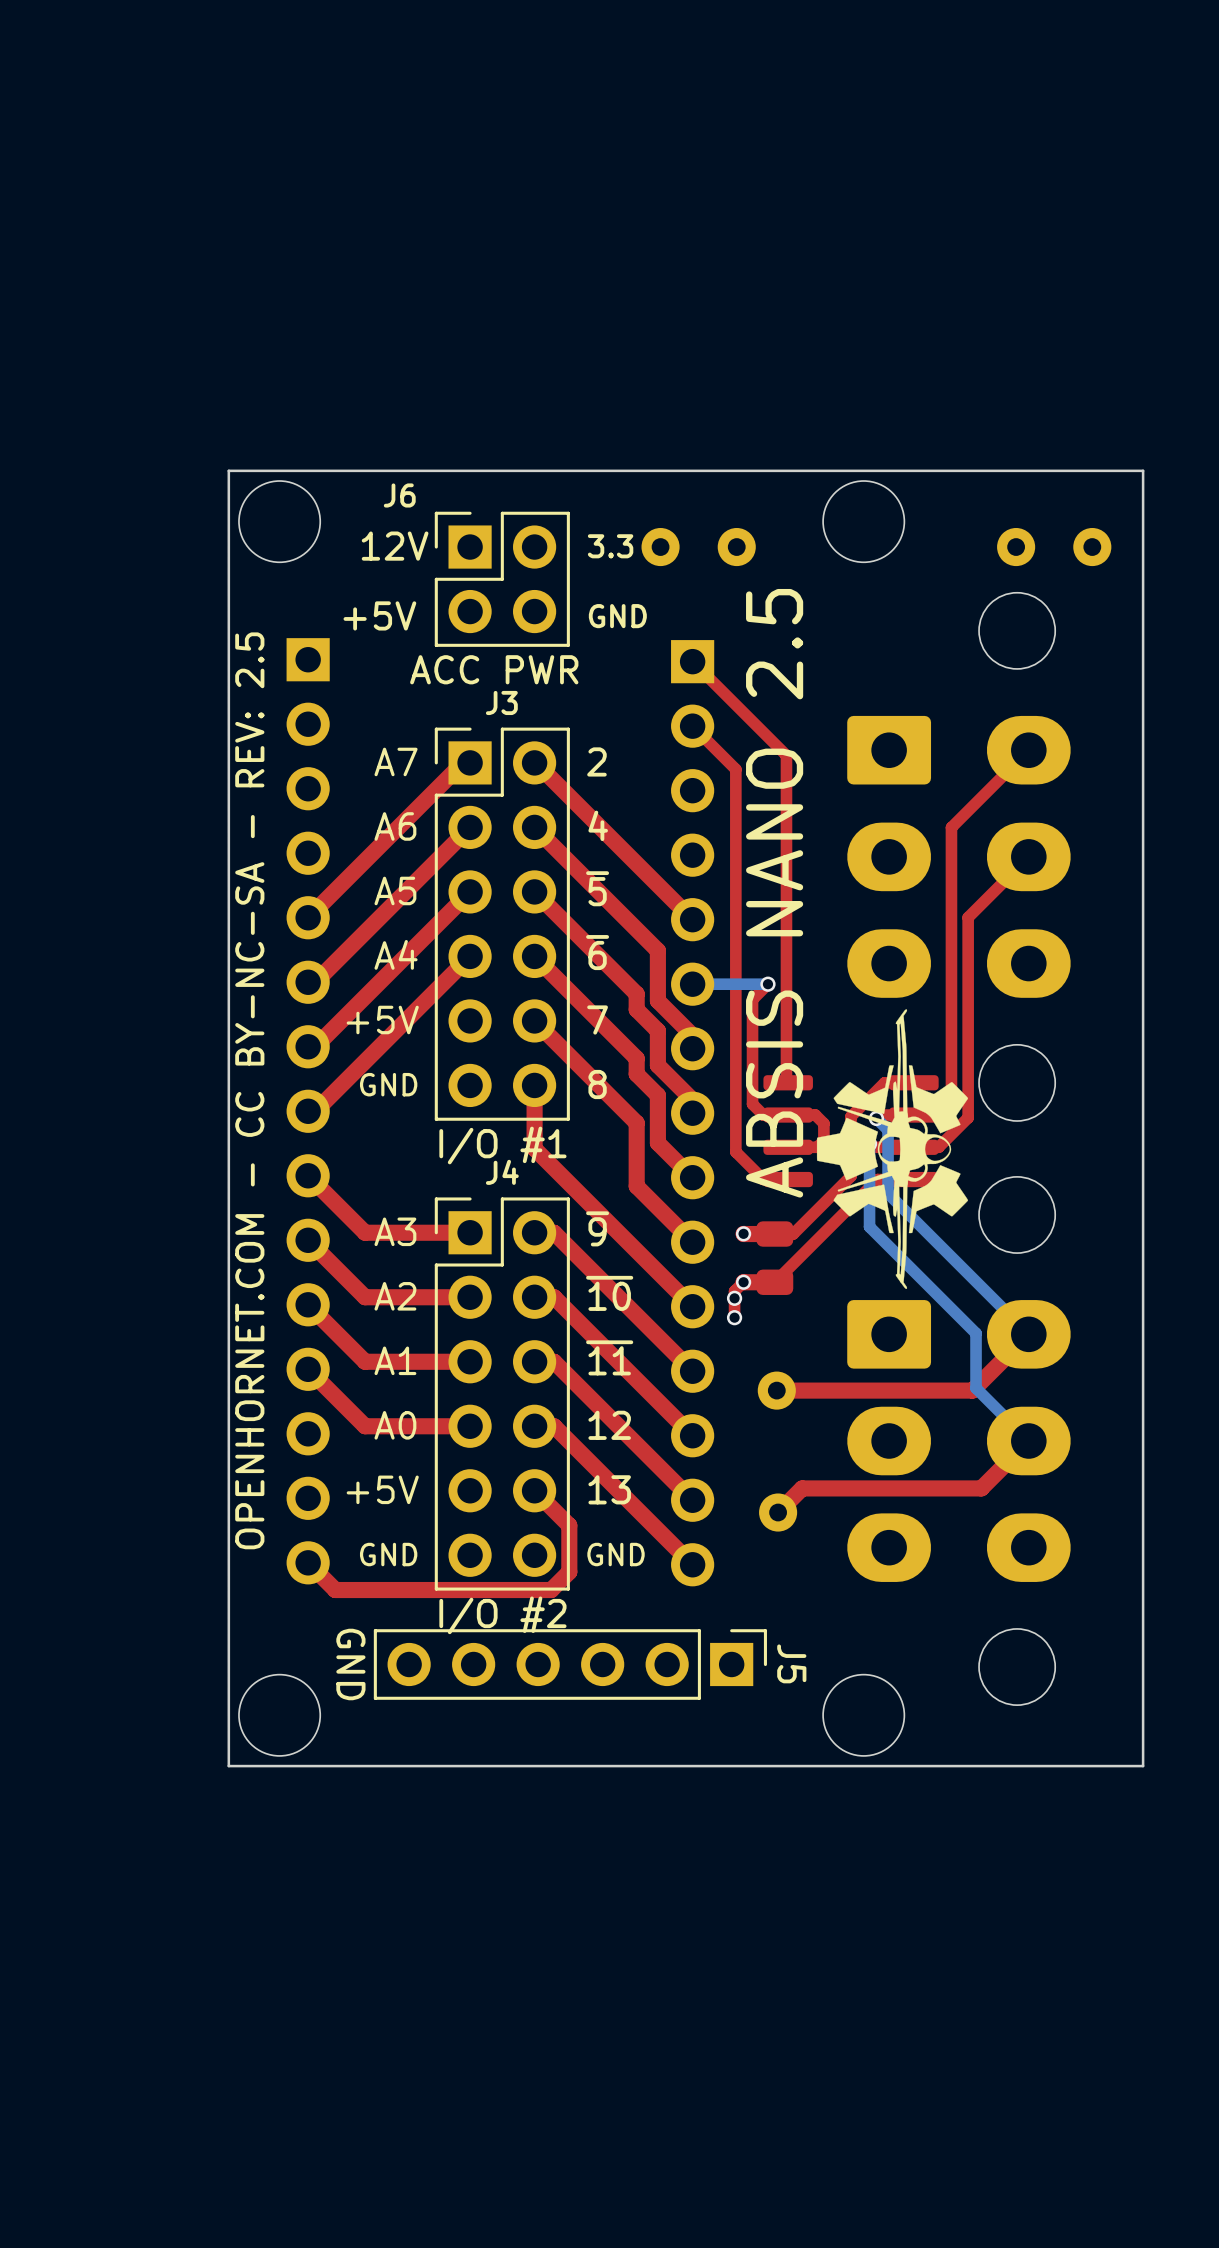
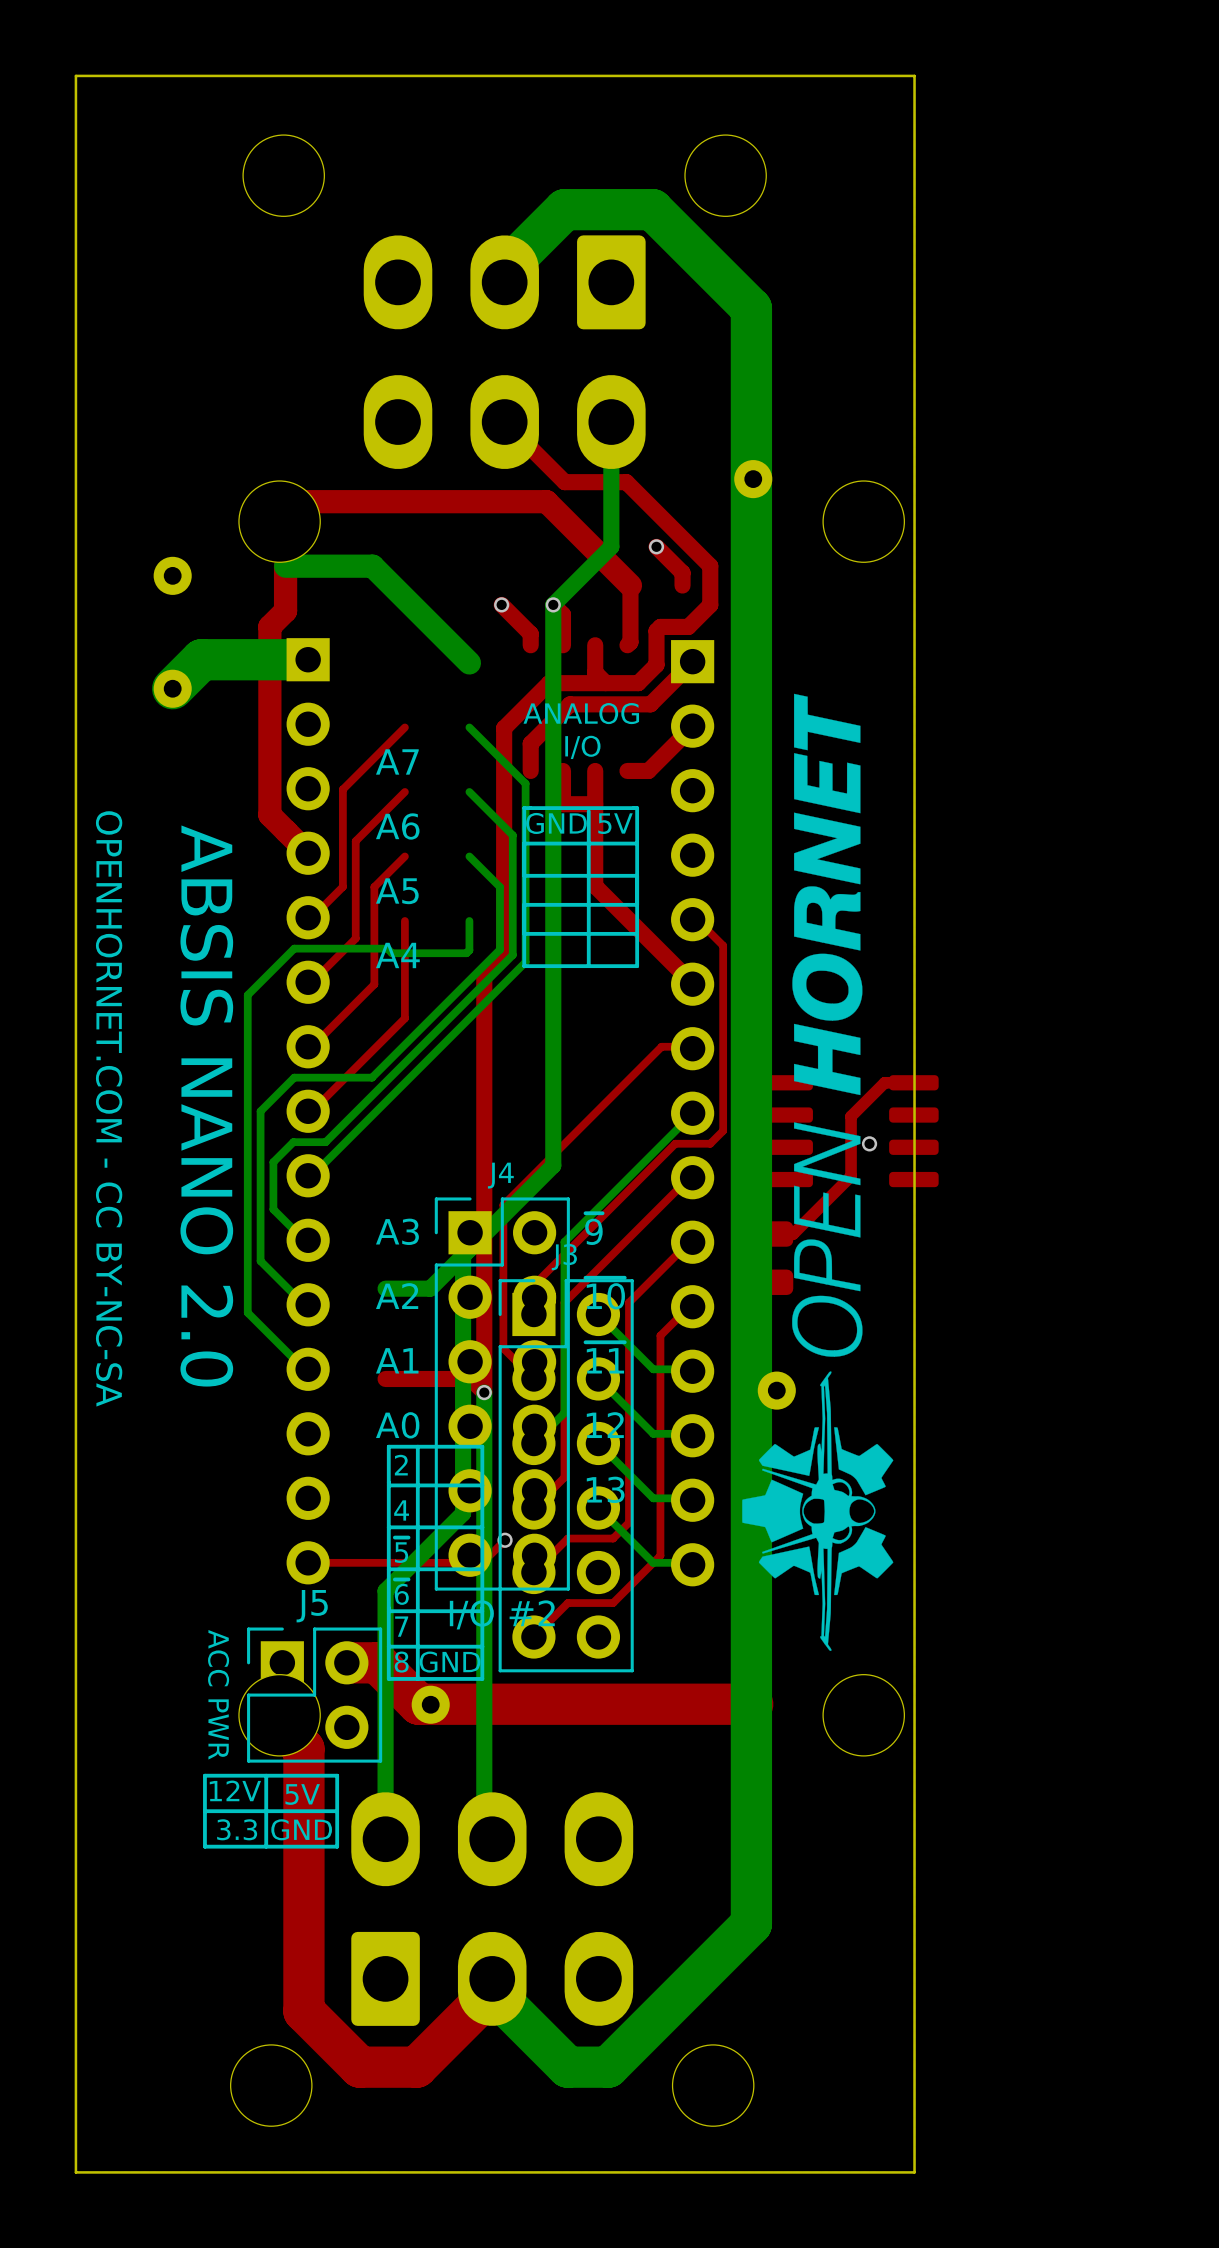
board edge: none -> (914, 75) (75, 75) (75, 2172) (914, 2172) (914, 75)
bottom track: none -> (504, 282) (504, 269) (564, 209) (652, 209) (751, 308) (751, 1923) (608, 2067) (567, 2067) (492, 1991) (492, 1966)
part: none -> (504, 302)
top track: none -> (504, 422) (564, 482) (626, 482) (710, 566) (710, 605) (688, 626) (660, 626) (656, 630) (656, 664) (638, 683) (549, 683) (504, 728) (504, 953) (484, 972) (484, 1392) (470, 1378) (385, 1378)
bottom track: none -> (611, 422) (611, 546) (553, 604) (553, 1165) (430, 1288) (385, 1288)
board edge: (1143, 470) (1143, 1766) (228, 1766) (228, 470) (1143, 470) -> none
part: none -> (753, 479)
top track: none -> (285, 501) (546, 501) (630, 585) (630, 642) (627, 645)
text: 12V (395, 546) -> none
text: 3.3 (610, 546) -> none
top track: none -> (656, 546) (682, 572) (682, 585)
via: none -> (656, 546)
part: (660, 547) -> none
part: (736, 547) -> none
part: (1016, 547) -> none
part: (1092, 547) -> none
top track: none -> (285, 566) (285, 610) (269, 626) (269, 814) (308, 853)
bottom track: none -> (285, 566) (372, 566) (469, 662)
part: none -> (172, 575)
J6: ACC PWR (502, 579) -> none
top track: none -> (501, 604) (530, 633) (530, 645)
via: none -> (501, 604)
top track: none -> (553, 604) (562, 614) (562, 645)
via: none -> (553, 604)
text: +5V (379, 615) -> none
text: GND (617, 616) -> none
top track: none -> (595, 645) (595, 672) (605, 683)
bottom track: none -> (308, 659) (201, 659) (172, 688)
top track: none -> (695, 659) (650, 704) (570, 704) (530, 743) (530, 770)
top track: (692, 661) (786, 755) (786, 1081) (788, 1082) -> none
part: none -> (172, 688)
drawing: none -> [742, 693, 894, 1651]
text: none -> ANALOG (581, 713)
top track: none -> (695, 724) (648, 770) (627, 770)
top track: (692, 726) (735, 769) (735, 1151) (763, 1179) (788, 1179) -> none
bottom track: none -> (469, 727) (525, 783) (525, 962) (312, 1175) (308, 1175)
top track: (1028, 750) (951, 827) (951, 1102) (938, 1115) (879, 1115) (876, 1118) -> none
text: 2 (596, 761) -> I/O (582, 747)
top track: (470, 762) (463, 762) (308, 917) -> (404, 727) (342, 789) (342, 886) (312, 917) (308, 917)
top track: (534, 762) (692, 919) (692, 906) -> none
top track: none -> (562, 770) (562, 804) (595, 804)
top track: none -> (595, 770) (595, 886) (691, 982) (695, 982)
bottom track: none -> (469, 791) (512, 835) (512, 955) (325, 1142) (293, 1142) (273, 1162) (273, 1209) (304, 1240) (308, 1240)
line: none -> (637, 808) (637, 966) (524, 966) (524, 808) (637, 808)
line: none -> (588, 811) (588, 966)
text: none -> GND (556, 823)
text: none -> 5V (615, 823)
text: 4 (598, 825) -> none
top track: (470, 827) (315, 982) (312, 982) -> (404, 791) (355, 841) (355, 938) (312, 982)
top track: (534, 827) (657, 950) (657, 1000) (692, 1035) (692, 1048) -> none
line: none -> (637, 843) (524, 843)
bottom track: none -> (469, 856) (499, 887) (499, 949) (372, 1077) (294, 1077) (260, 1111) (260, 1261) (304, 1304) (308, 1304)
part: (958, 856) -> none
top track: (1028, 856) (968, 917) (968, 1117) (938, 1147) (872, 1147) (869, 1143) -> none
line: none -> (637, 875) (524, 875)
text: ~{5} (597, 888) -> none
top track: (470, 891) (315, 1046) (312, 1046) -> (404, 856) (374, 887) (374, 984) (312, 1046)
top track: (534, 891) (636, 994) (636, 1009) (657, 1030) (657, 1065) (692, 1100) (692, 1113) -> none
text: ABSIS NANO 2.5 (774, 893) -> none
line: none -> (637, 904) (524, 904)
top track: none -> (695, 917) (723, 945) (723, 1130) (710, 1143) (675, 1143) (533, 1285) (533, 1314)
bottom track: none -> (469, 920) (469, 950) (466, 953) (391, 953) (387, 948) (294, 948) (247, 995) (247, 1312) (304, 1369) (308, 1369)
J3 position: (502, 924) -> (566, 1475)
line: none -> (637, 933) (524, 933)
text: ~{6} (597, 952) -> none
top track: (470, 956) (315, 1111) (312, 1111) -> (404, 920) (404, 1018) (312, 1111)
top track: (534, 956) (636, 1058) (636, 1074) (657, 1095) (657, 1142) (692, 1177) -> none
top track: (767, 984) (752, 999) (752, 1104) (763, 1115) (815, 1115) (823, 1123) (823, 1140) (817, 1147) (788, 1147) -> none
bottom track: (767, 984) (692, 984) -> none
via: (767, 984) -> none
drawing: [816, 1009, 969, 1289] -> none
text: +5V (382, 1019) -> none
text position: 7 (597, 1019) -> 7 (401, 1626)
top track: (534, 1020) (636, 1123) (636, 1186) (692, 1242) -> none
top track: none -> (695, 1046) (661, 1046) (503, 1205) (503, 1348) (533, 1378)
text: GND (388, 1084) -> none
text position: 8 (597, 1084) -> 8 (401, 1662)
top track: (534, 1085) (534, 1148) (692, 1306) -> none
text: OPENHORNET.COM - CC BY-NC-SA - REV: 2.5 (249, 1090) -> none
text: none -> ABSIS NANO 2.0 (206, 1106)
text: none -> OPENHORNET.COM - CC BY-NC-SA (109, 1108)
bottom track: none -> (695, 1111) (564, 1242) (564, 1412) (533, 1443)
bottom track: (876, 1118) (888, 1130) (888, 1193) (1028, 1334) -> none
via: (876, 1118) -> none
bottom track: (869, 1143) (869, 1226) (976, 1333) (976, 1388) (1028, 1441) -> none
J3 value: I/O #1 (502, 1145) -> none
top track: (308, 1175) (365, 1232) (470, 1232) -> none
top track: none -> (695, 1175) (691, 1175) (564, 1302) (564, 1477) (533, 1508)
top track: (913, 1179) (877, 1179) (774, 1282) (743, 1282) (734, 1291) (734, 1317) -> none
top track: (534, 1232) (554, 1232) (692, 1371) -> none
via: (743, 1233) -> none
top track: (308, 1240) (365, 1297) (470, 1297) -> none
top track: none -> (695, 1240) (691, 1240) (628, 1302) (628, 1522) (613, 1538) (567, 1538) (533, 1572)
bottom track: none -> (463, 1255) (463, 1513) (385, 1590) (385, 1826)
via: (743, 1282) -> none
top track: (534, 1297) (554, 1297) (692, 1435) -> none
via: (734, 1298) -> none
top track: (308, 1304) (365, 1361) (470, 1361) -> none
top track: none -> (695, 1304) (691, 1304) (660, 1335) (660, 1555) (613, 1603) (567, 1603) (533, 1637)
bottom track: none -> (598, 1314) (653, 1369) (695, 1369)
via: (734, 1317) -> none
top track: (1028, 1334) (972, 1390) (776, 1390) -> none
top track: (534, 1361) (554, 1361) (692, 1500) -> none
top track: (308, 1369) (365, 1426) (470, 1426) -> none
bottom track: none -> (598, 1378) (653, 1433) (695, 1433)
bottom track: none -> (484, 1392) (484, 1818) (492, 1826)
via: none -> (484, 1392)
top track: (534, 1426) (554, 1426) (692, 1564) -> none
part: (958, 1441) -> none
top track: (1028, 1441) (981, 1488) (802, 1488) (778, 1512) -> none
bottom track: none -> (598, 1443) (653, 1498) (695, 1498)
line: none -> (417, 1446) (417, 1678)
line: none -> (482, 1446) (482, 1678) (388, 1678) (388, 1446) (482, 1446)
text: none -> 2 (401, 1465)
line: none -> (482, 1485) (388, 1485)
text: +5V (382, 1489) -> none
top track: (534, 1490) (569, 1525) (569, 1571) (551, 1590) (335, 1590) (308, 1562) -> (505, 1540) (482, 1562) (308, 1562)
bottom track: none -> (598, 1508) (653, 1562) (695, 1562)
text: none -> 4 (401, 1510)
line: none -> (482, 1527) (388, 1527)
via: none -> (505, 1540)
text: GND (388, 1554) -> ~{5} (401, 1550)
text: GND (616, 1554) -> none
line: none -> (482, 1569) (388, 1569)
text: none -> ~{6} (401, 1592)
line: none -> (482, 1611) (388, 1611)
J5 footprint: [373, 1629, 767, 1700] -> [247, 1627, 383, 1763]
line: none -> (482, 1646) (388, 1646)
top track: none -> (346, 1662) (377, 1662) (418, 1704) (752, 1704)
text: none -> GND (450, 1662)
J5 name position: J5 (791, 1663) -> J5 (312, 1606)
J5 value: GND (350, 1664) -> none
text: none -> ACC PWR (218, 1694)
part: none -> (430, 1704)
top track: none -> (282, 1727) (303, 1748) (303, 2011) (359, 2067) (416, 2067) (492, 1991) (492, 1978)
line: none -> (266, 1775) (266, 1846)
line: none -> (337, 1775) (337, 1846) (204, 1846) (204, 1775) (337, 1775)
text: none -> 12V (235, 1790)
text: none -> 5V (302, 1794)
line: none -> (337, 1811) (204, 1811)
text: none -> 3.3 (237, 1829)
text: none -> GND (301, 1829)
part: none -> (492, 1959)

